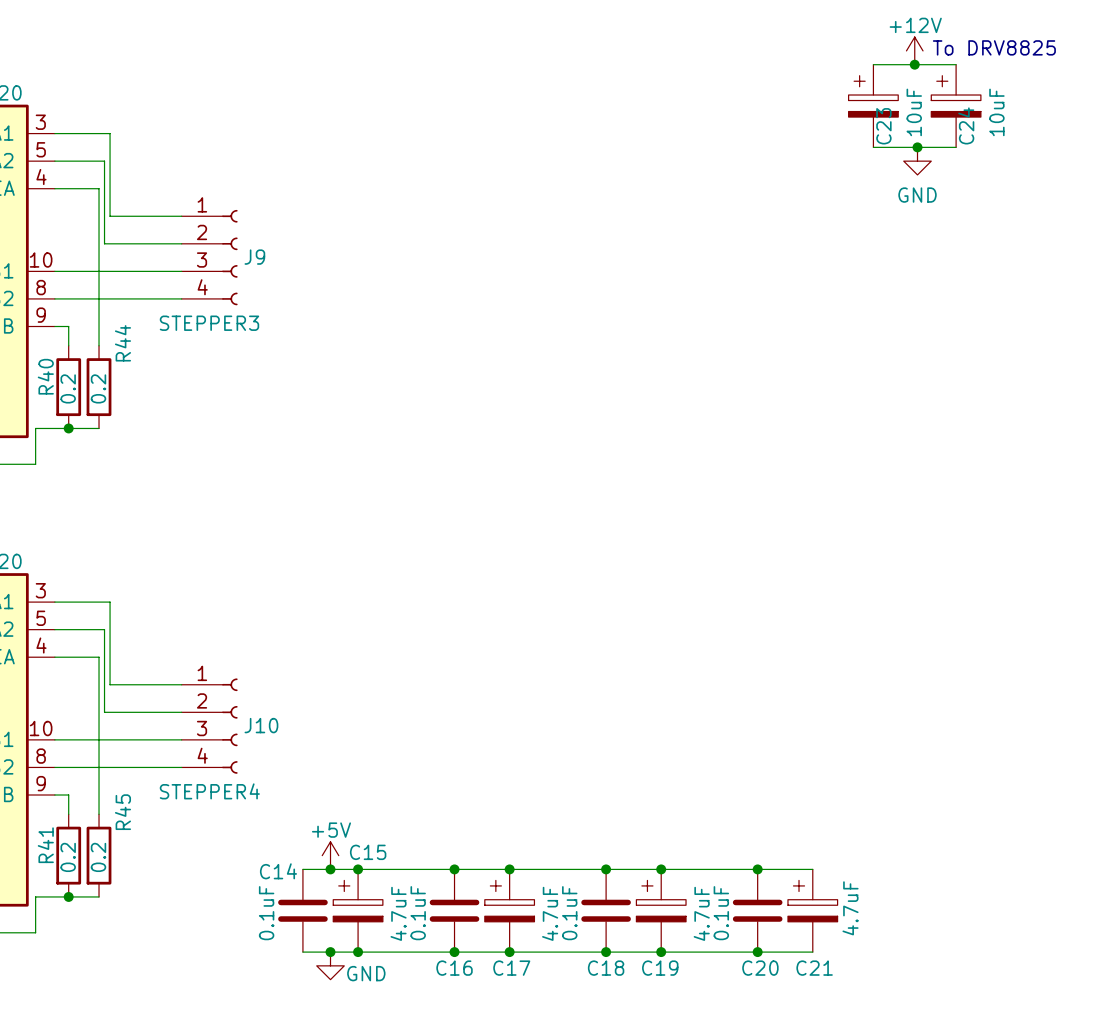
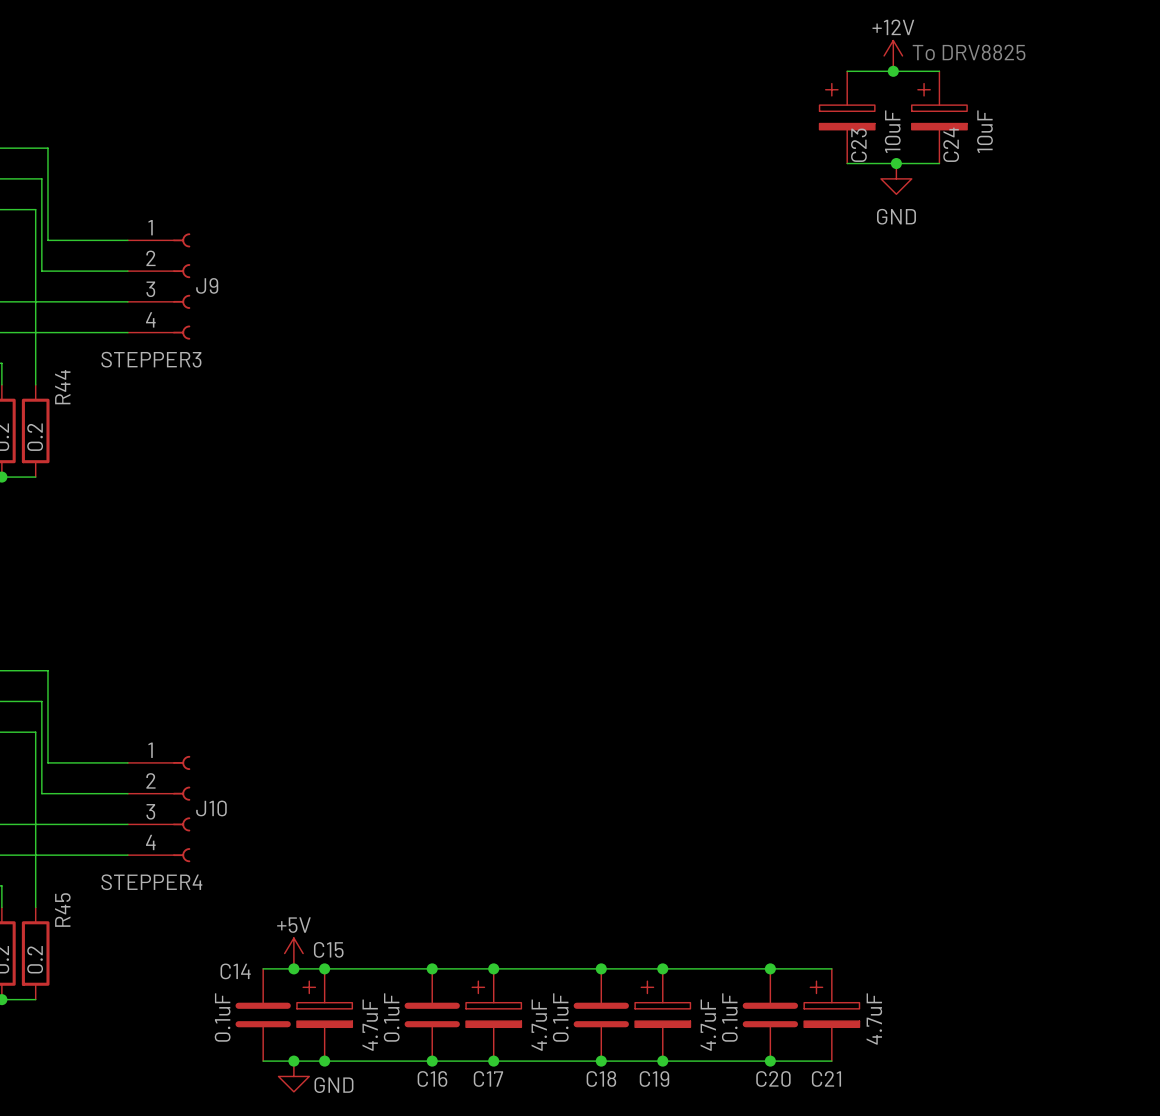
text position: To DRV8825 (994, 47) -> To DRV8825 (969, 52)
power symbol position: +12V (914, 50) -> +12V (893, 55)
junction: none -> (893, 71)
wire: (909, 64) (956, 64) -> (847, 71) (899, 71)
junction: (914, 64) -> none
C23 position: (873, 106) -> (847, 117)
C24 position: (956, 106) -> (939, 117)
junction: none -> (896, 163)
wire: (909, 147) (956, 147) -> (847, 163) (899, 163)
junction: (917, 147) -> none
power symbol position: GND (917, 161) -> GND (896, 178)

